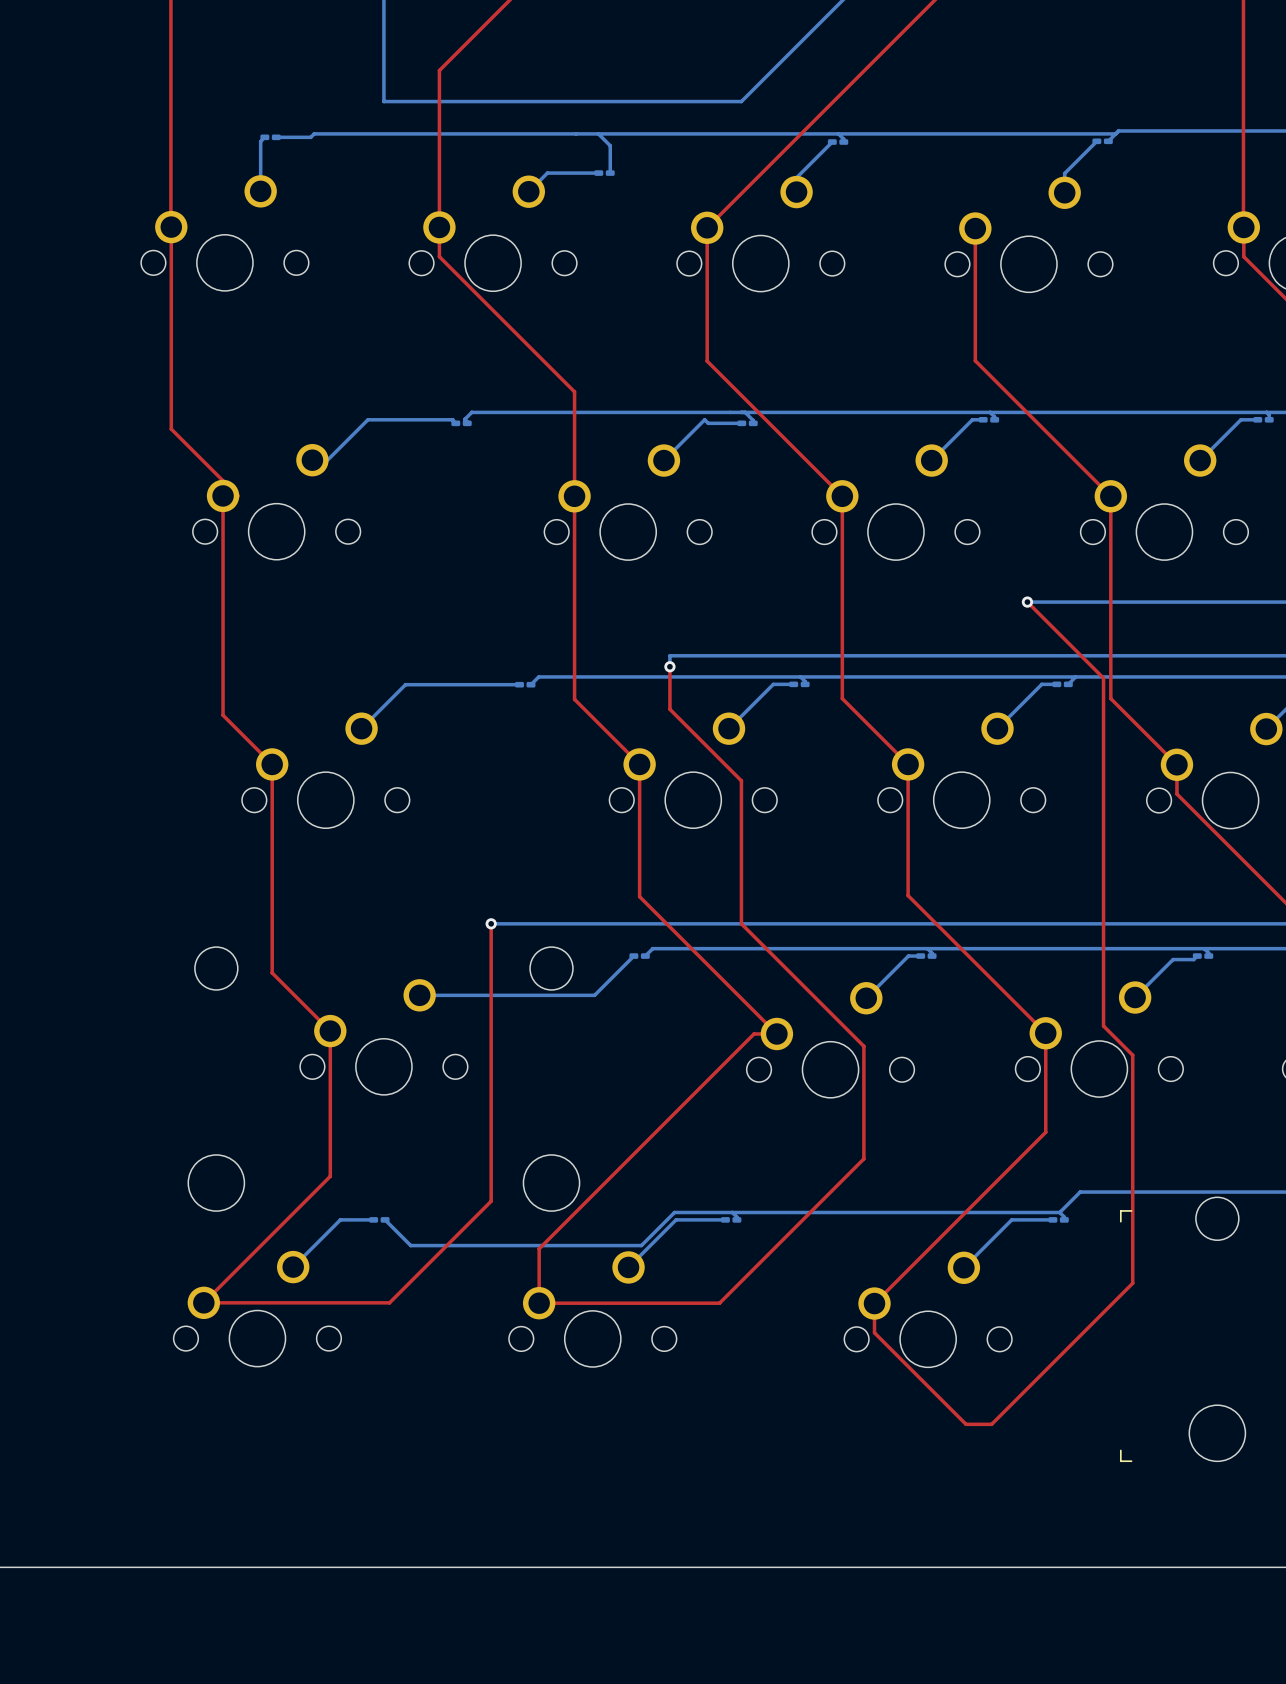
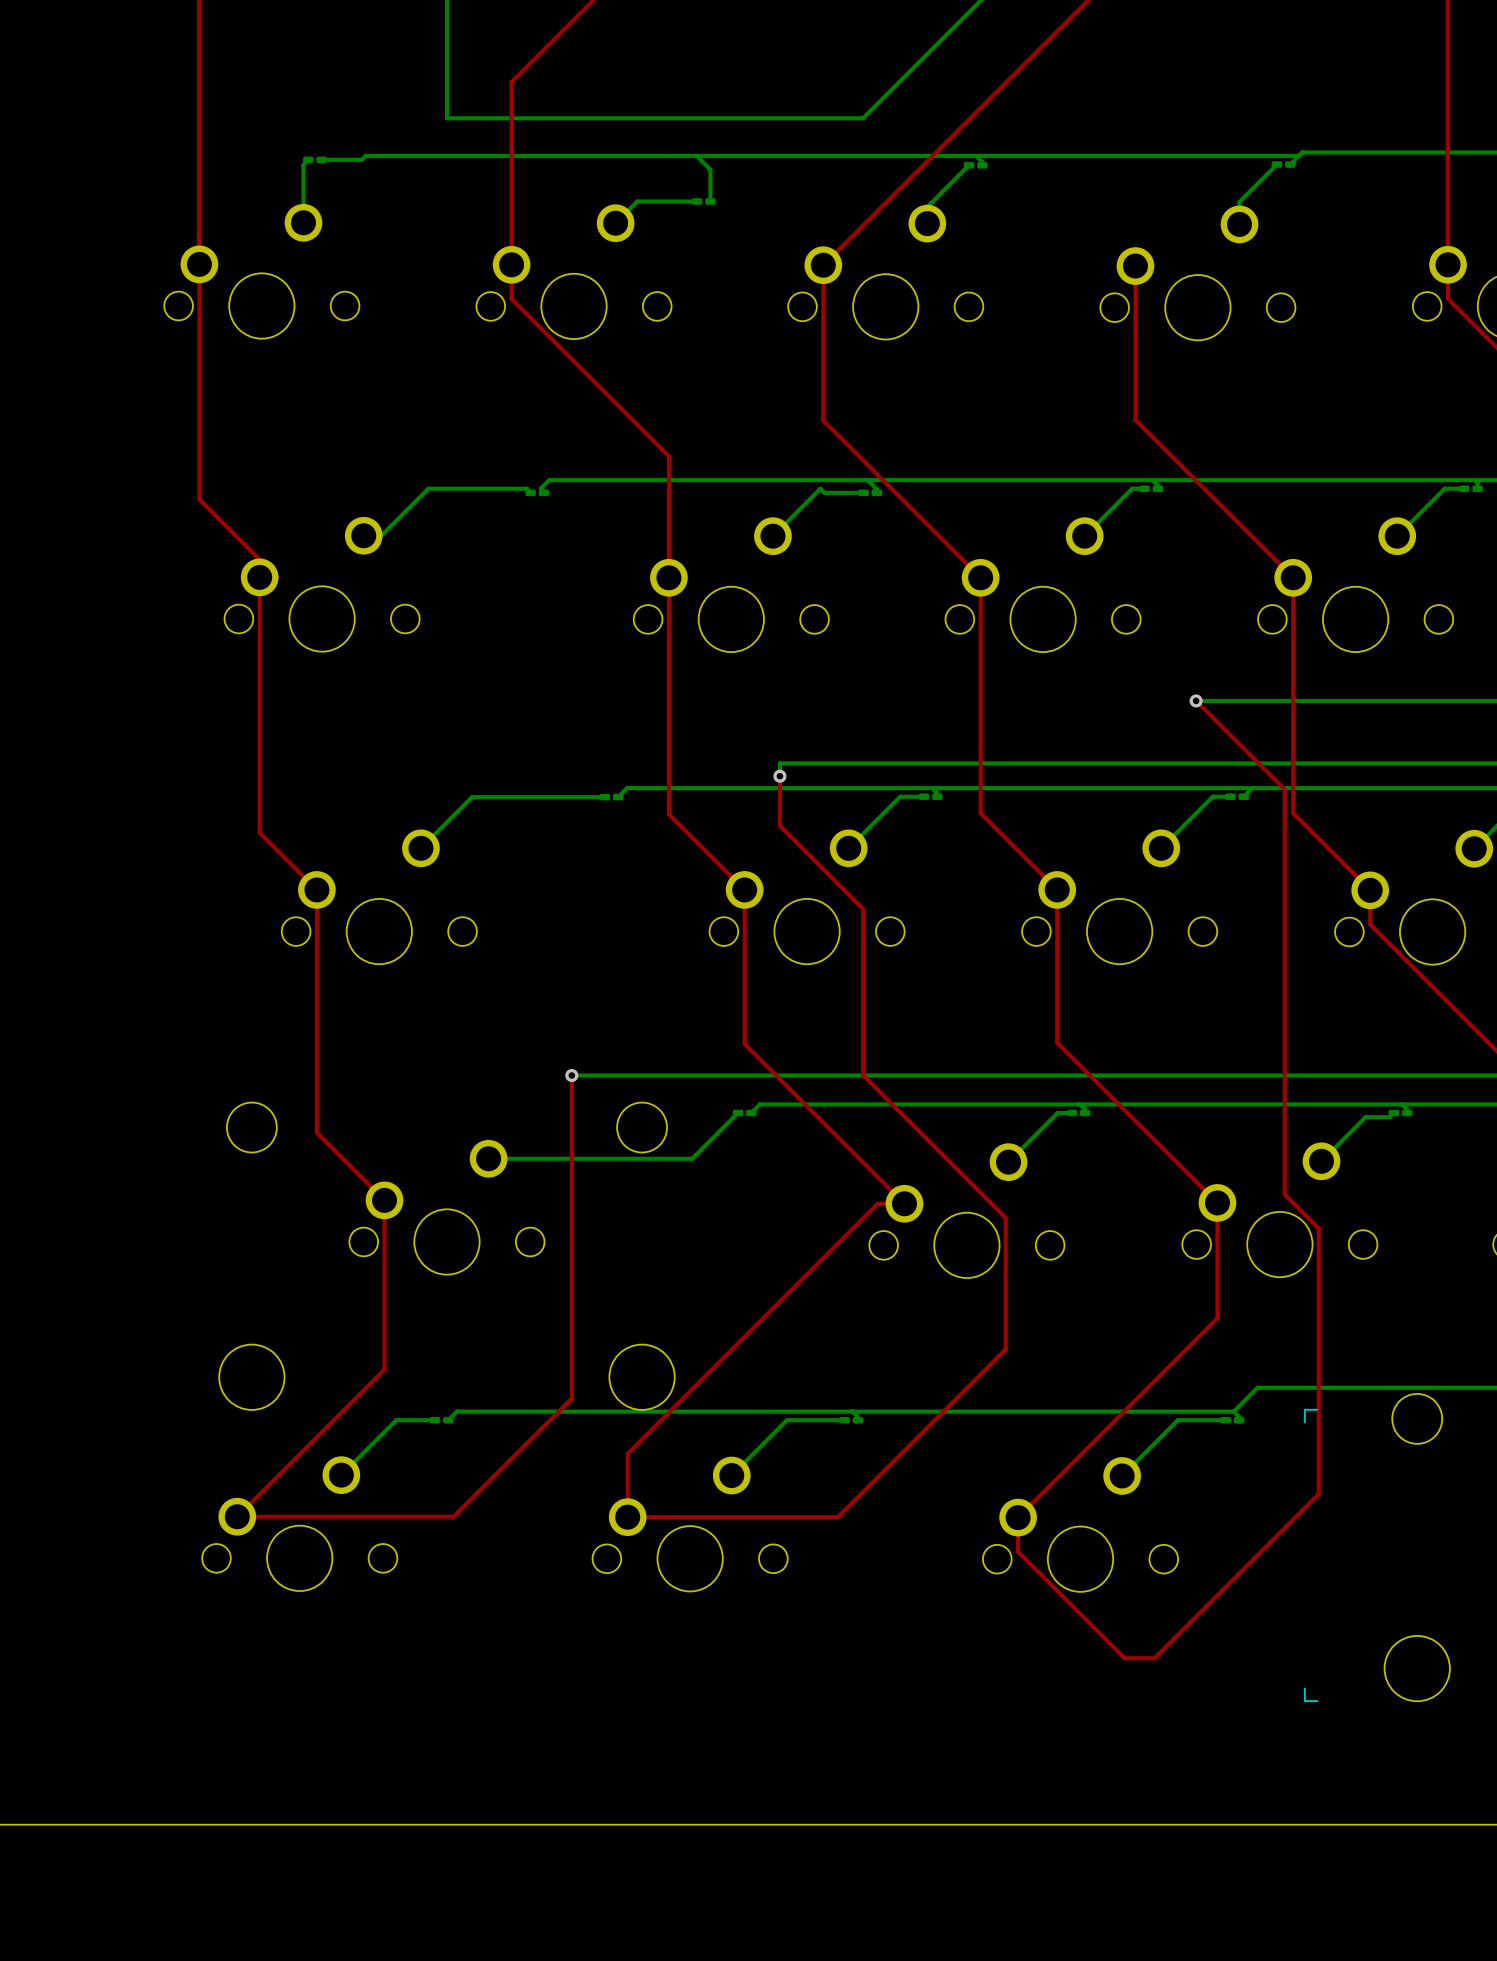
bottom track: (674, 1212) (641, 1245) (410, 1245) (385, 1219) -> (785, 1411) (456, 1411) (448, 1420)

